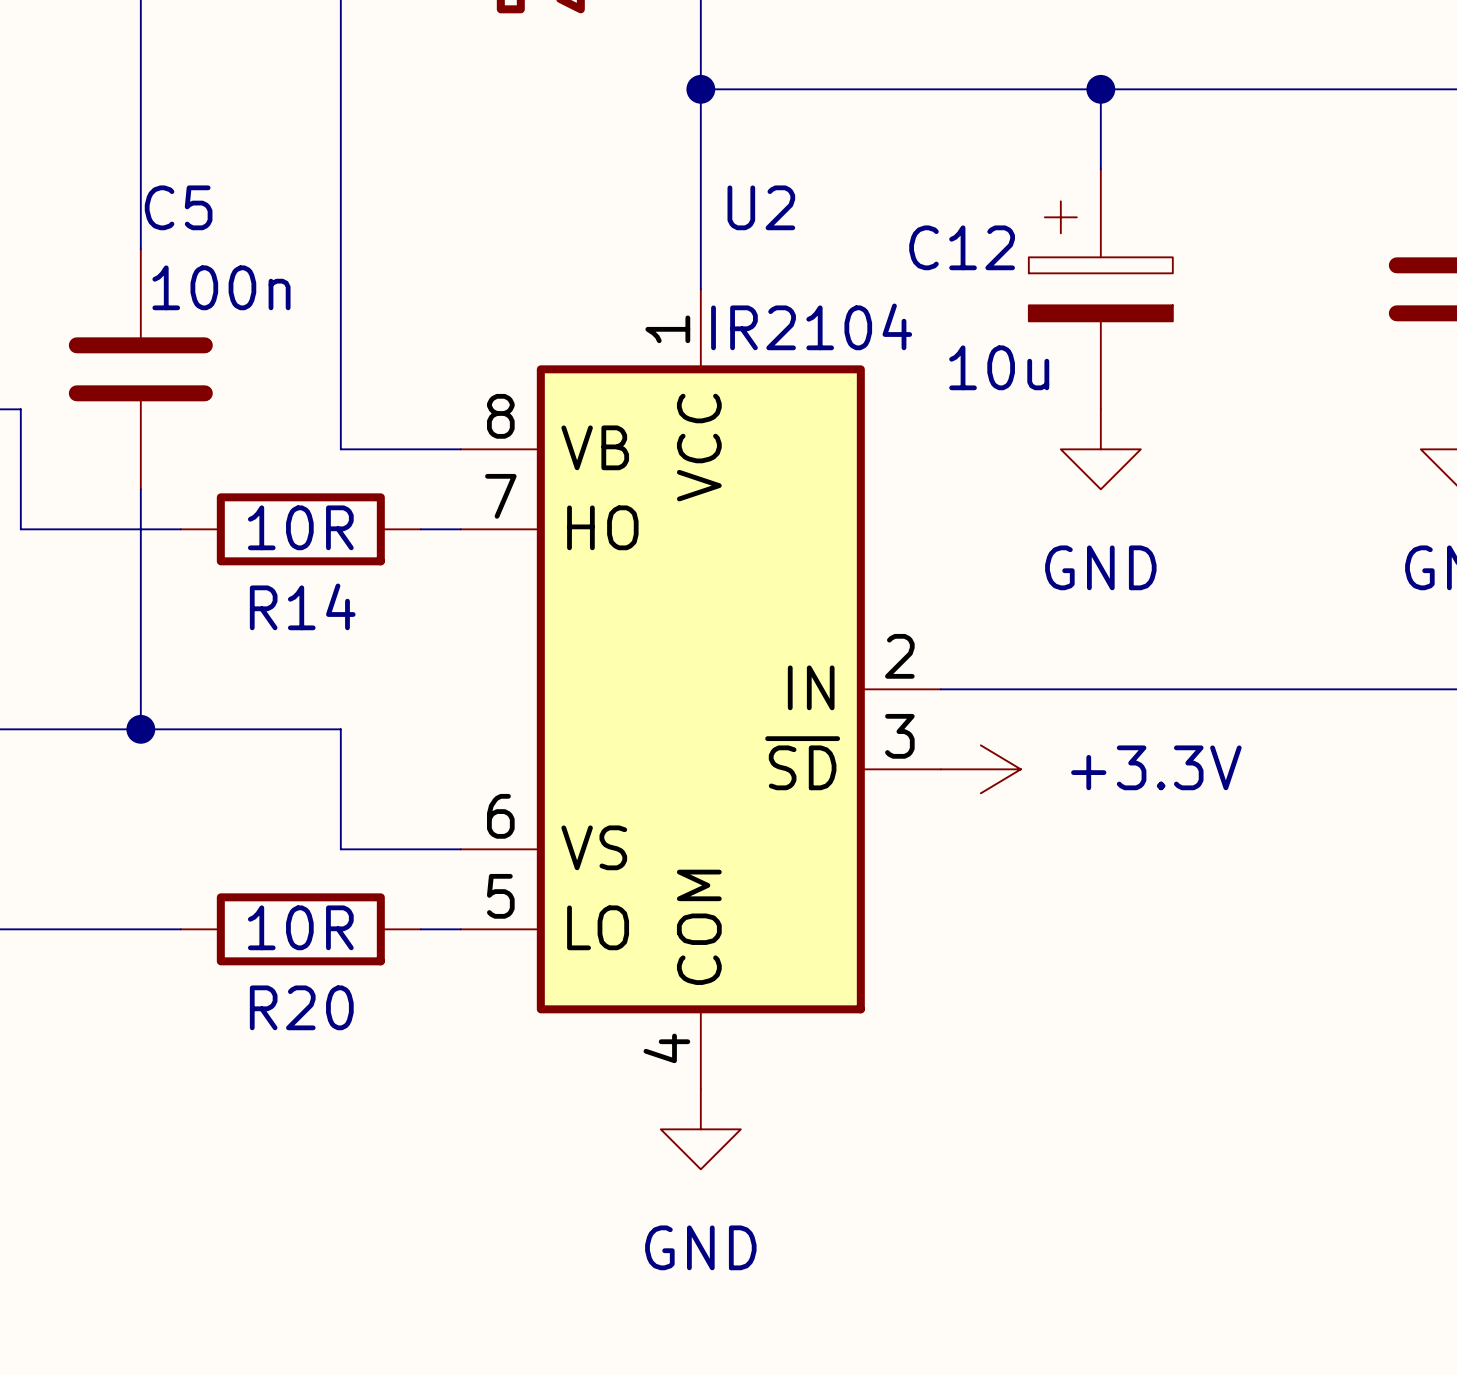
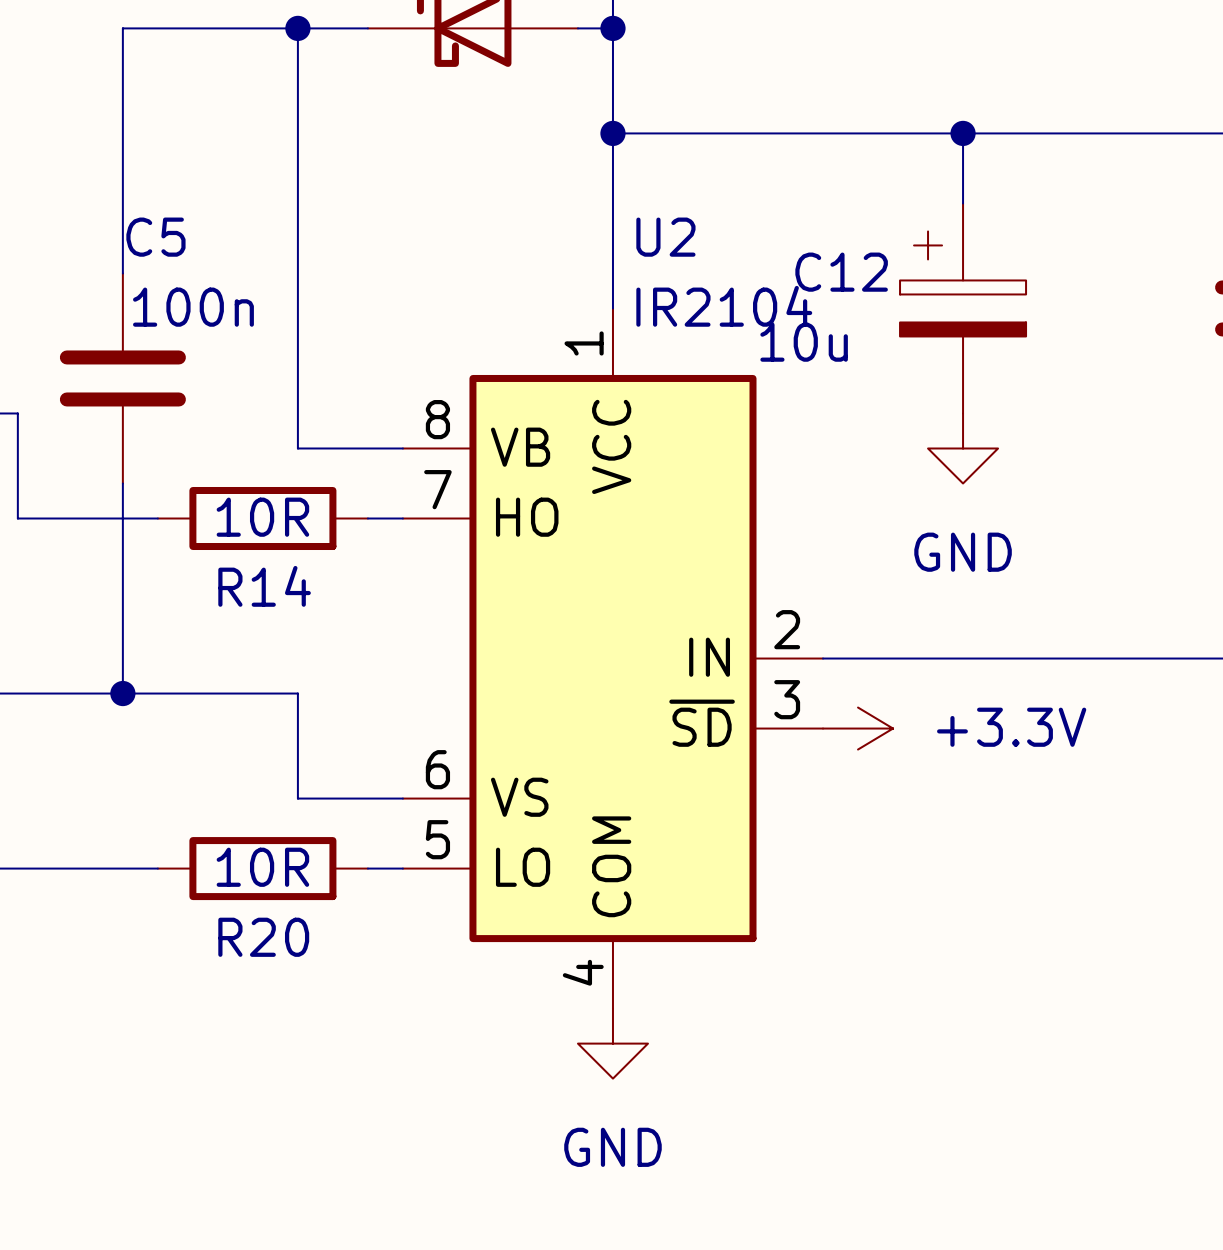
U2 value position: IR2104 (811, 326) -> IR2104 (724, 306)
C12 value position: 10u (999, 367) -> 10u (804, 342)

